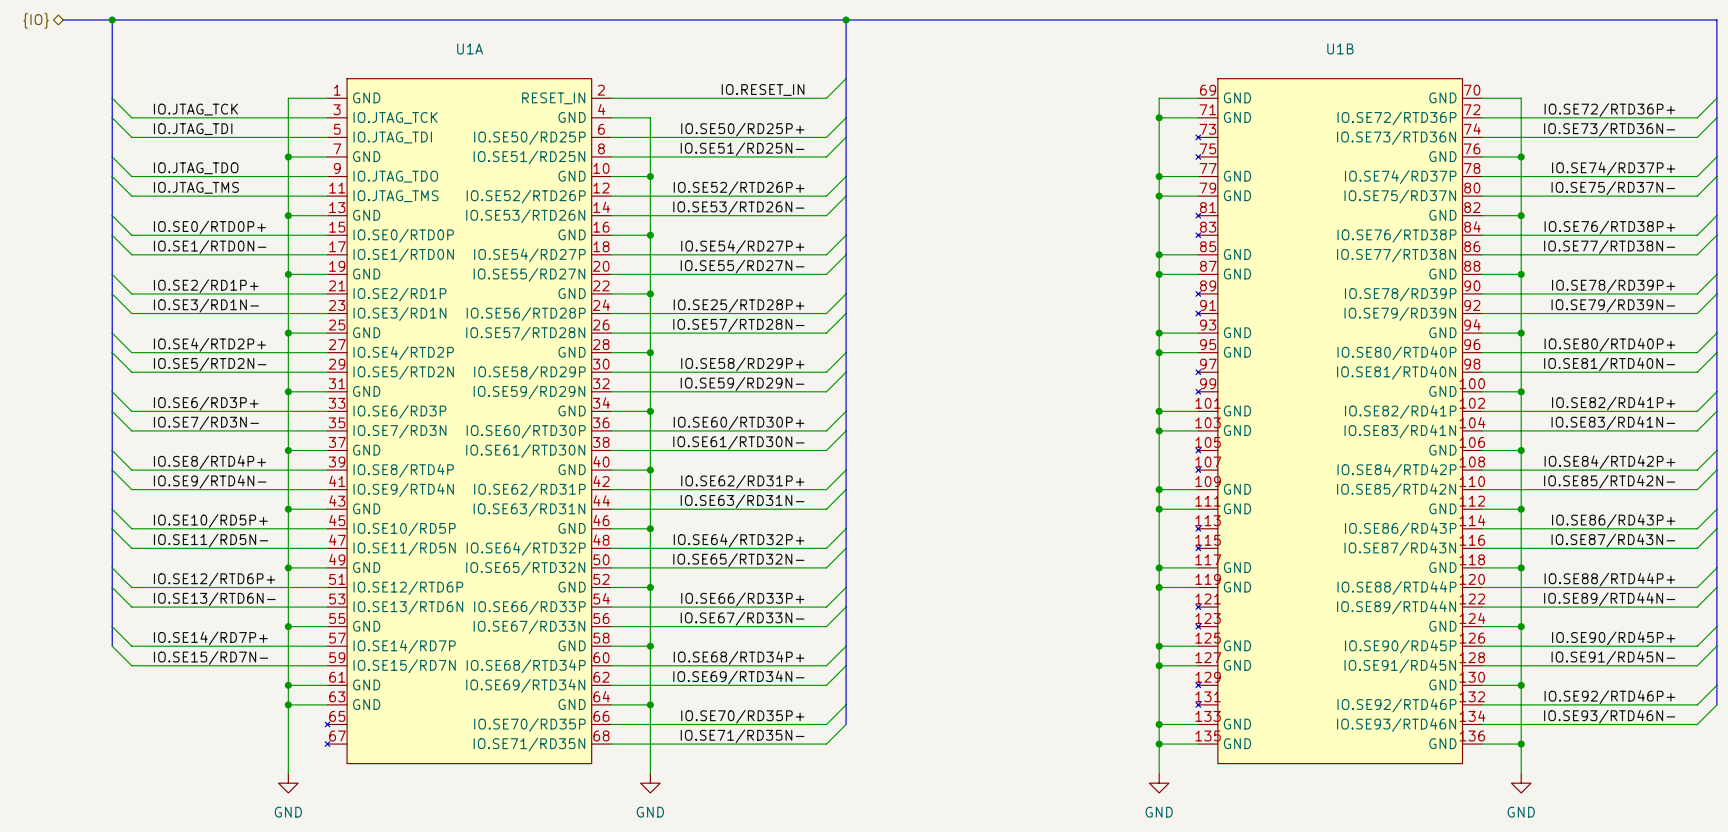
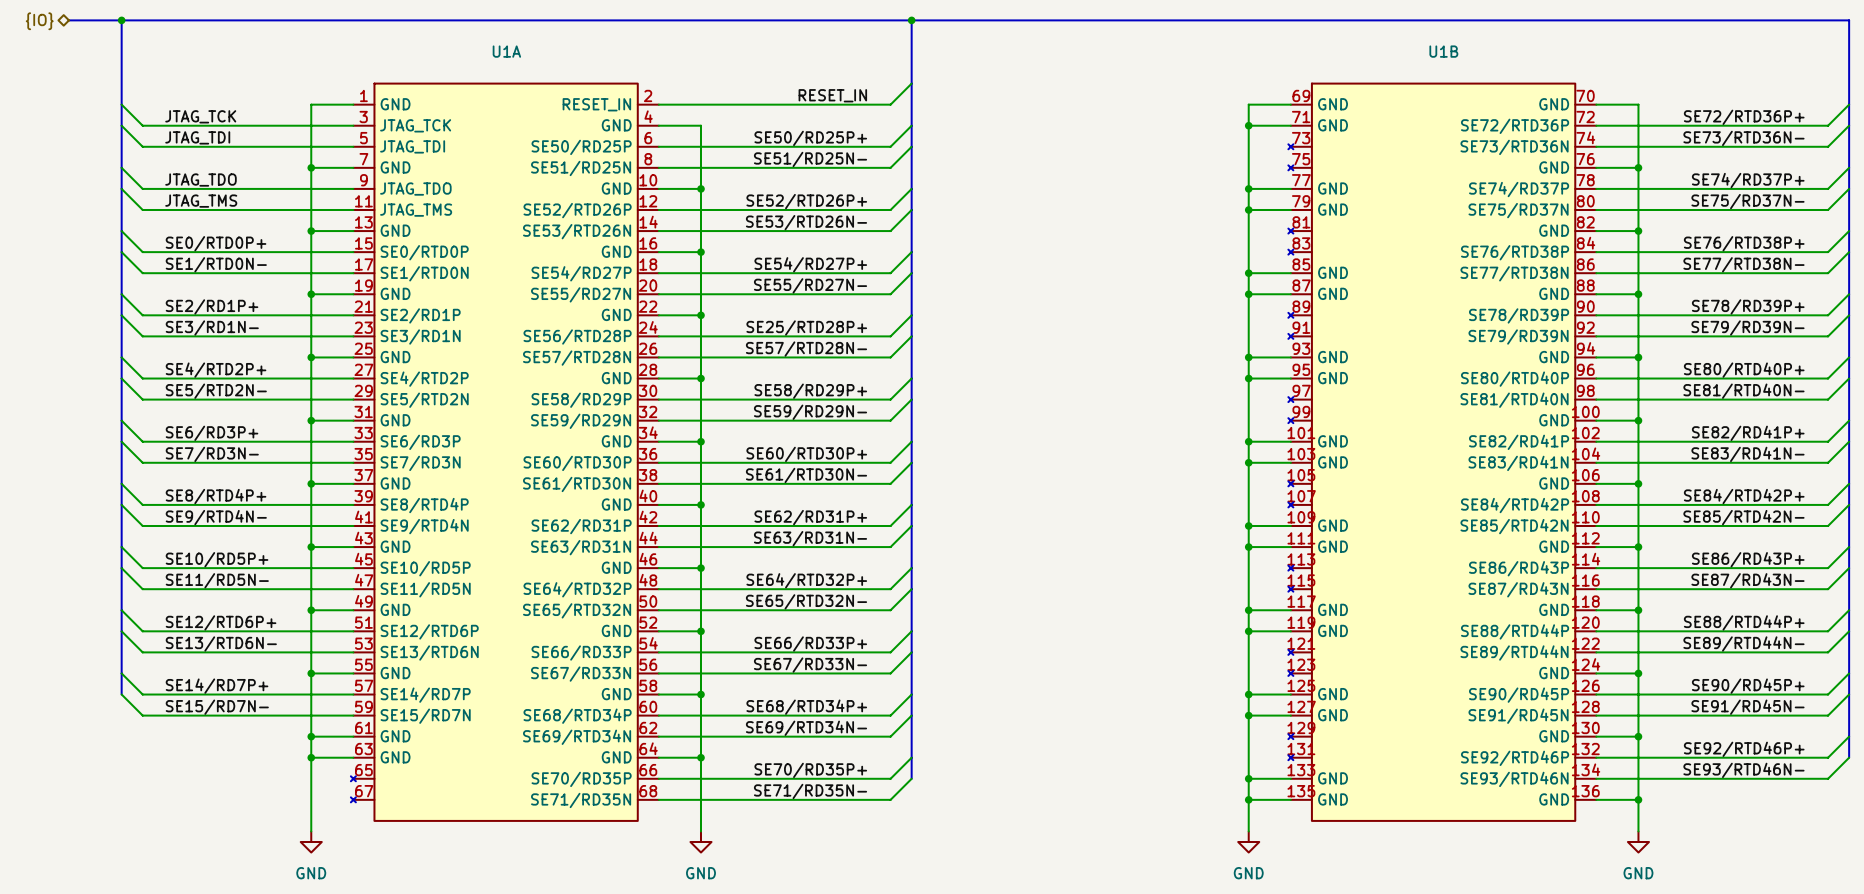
U1A symbol: [325, 78, 612, 764] -> [350, 83, 659, 821]
U1B symbol: [1196, 78, 1483, 764] -> [1288, 83, 1597, 821]
label: IO.RESET_IN (763, 89) -> RESET_IN (832, 95)
label: IO.JTAG_TCK (195, 109) -> JTAG_TCK (200, 116)
label: IO.SE72/RTD36P+ (1609, 110) -> SE72/RTD36P+ (1744, 117)
label: IO.JTAG_TDI (193, 129) -> JTAG_TDI (197, 137)
label: IO.SE50/RD25P+ (742, 129) -> SE50/RD25P+ (810, 138)
label: IO.SE73/RTD36N- (1609, 129) -> SE73/RTD36N- (1743, 138)
label: IO.SE51/RD25N- (742, 149) -> SE51/RD25N- (810, 159)
label: IO.JTAG_TDO (196, 168) -> JTAG_TDO (200, 180)
label: IO.SE74/RD37P+ (1613, 168) -> SE74/RD37P+ (1748, 180)
label: IO.JTAG_TMS (196, 187) -> JTAG_TMS (201, 201)
label: IO.SE52/RTD26P+ (739, 188) -> SE52/RTD26P+ (806, 201)
label: IO.SE75/RD37N- (1613, 188) -> SE75/RD37N- (1747, 201)
label: IO.SE53/RTD26N- (738, 207) -> SE53/RTD26N- (806, 222)
label: IO.SE0/RTD0P+ (209, 227) -> SE0/RTD0P+ (216, 243)
label: IO.SE76/RTD38P+ (1609, 227) -> SE76/RTD38P+ (1744, 243)
label: IO.SE1/RTD0N- (210, 247) -> SE1/RTD0N- (216, 264)
label: IO.SE54/RD27P+ (742, 247) -> SE54/RD27P+ (810, 264)
label: IO.SE77/RTD38N- (1609, 247) -> SE77/RTD38N- (1743, 264)
label: IO.SE55/RD27N- (742, 266) -> SE55/RD27N- (810, 285)
label: IO.SE2/RD1P+ (206, 286) -> SE2/RD1P+ (212, 306)
label: IO.SE78/RD39P+ (1613, 286) -> SE78/RD39P+ (1748, 306)
label: IO.SE3/RD1N- (206, 305) -> SE3/RD1N- (212, 327)
label: IO.SE25/RTD28P+ (739, 305) -> SE25/RTD28P+ (806, 327)
label: IO.SE79/RD39N- (1613, 305) -> SE79/RD39N- (1747, 327)
label: IO.SE57/RTD28N- (738, 325) -> SE57/RTD28N- (806, 349)
label: IO.SE4/RTD2P+ (209, 344) -> SE4/RTD2P+ (216, 370)
label: IO.SE80/RTD40P+ (1609, 344) -> SE80/RTD40P+ (1744, 370)
label: IO.SE5/RTD2N- (210, 364) -> SE5/RTD2N- (216, 391)
label: IO.SE58/RD29P+ (742, 364) -> SE58/RD29P+ (810, 391)
label: IO.SE81/RTD40N- (1609, 364) -> SE81/RTD40N- (1743, 391)
label: IO.SE59/RD29N- (742, 384) -> SE59/RD29N- (810, 412)
label: IO.SE6/RD3P+ (206, 403) -> SE6/RD3P+ (212, 433)
label: IO.SE82/RD41P+ (1613, 403) -> SE82/RD41P+ (1748, 433)
label: IO.SE7/RD3N- (206, 423) -> SE7/RD3N- (212, 454)
label: IO.SE60/RTD30P+ (739, 423) -> SE60/RTD30P+ (806, 454)
label: IO.SE83/RD41N- (1613, 423) -> SE83/RD41N- (1747, 454)
label: IO.SE61/RTD30N- (738, 442) -> SE61/RTD30N- (806, 475)
label: IO.SE8/RTD4P+ (209, 462) -> SE8/RTD4P+ (216, 496)
label: IO.SE84/RTD42P+ (1609, 462) -> SE84/RTD42P+ (1744, 496)
label: IO.SE9/RTD4N- (210, 481) -> SE9/RTD4N- (216, 517)
label: IO.SE62/RD31P+ (742, 481) -> SE62/RD31P+ (810, 517)
label: IO.SE85/RTD42N- (1609, 481) -> SE85/RTD42N- (1743, 517)
label: IO.SE63/RD31N- (742, 501) -> SE63/RD31N- (810, 538)
label: IO.SE10/RD5P+ (210, 520) -> SE10/RD5P+ (217, 559)
label: IO.SE86/RD43P+ (1613, 520) -> SE86/RD43P+ (1748, 559)
label: IO.SE11/RD5N- (211, 540) -> SE11/RD5N- (217, 580)
label: IO.SE64/RTD32P+ (739, 540) -> SE64/RTD32P+ (806, 580)
label: IO.SE87/RD43N- (1613, 540) -> SE87/RD43N- (1747, 580)
label: IO.SE65/RTD32N- (738, 560) -> SE65/RTD32N- (806, 601)
label: IO.SE12/RTD6P+ (214, 579) -> SE12/RTD6P+ (221, 622)
label: IO.SE88/RTD44P+ (1609, 579) -> SE88/RTD44P+ (1744, 622)
label: IO.SE13/RTD6N- (214, 599) -> SE13/RTD6N- (221, 643)
label: IO.SE66/RD33P+ (742, 599) -> SE66/RD33P+ (810, 643)
label: IO.SE89/RTD44N- (1609, 599) -> SE89/RTD44N- (1743, 643)
label: IO.SE67/RD33N- (742, 618) -> SE67/RD33N- (810, 665)
label: IO.SE14/RD7P+ (210, 638) -> SE14/RD7P+ (217, 686)
label: IO.SE90/RD45P+ (1613, 638) -> SE90/RD45P+ (1748, 686)
label: IO.SE15/RD7N- (211, 657) -> SE15/RD7N- (217, 707)
label: IO.SE68/RTD34P+ (739, 657) -> SE68/RTD34P+ (806, 707)
label: IO.SE91/RD45N- (1613, 657) -> SE91/RD45N- (1747, 707)
label: IO.SE69/RTD34N- (738, 677) -> SE69/RTD34N- (806, 728)
label: IO.SE92/RTD46P+ (1609, 697) -> SE92/RTD46P+ (1744, 749)
label: IO.SE70/RD35P+ (742, 716) -> SE70/RD35P+ (810, 770)
label: IO.SE93/RTD46N- (1609, 716) -> SE93/RTD46N- (1743, 770)
label: IO.SE71/RD35N- (742, 736) -> SE71/RD35N- (810, 791)

